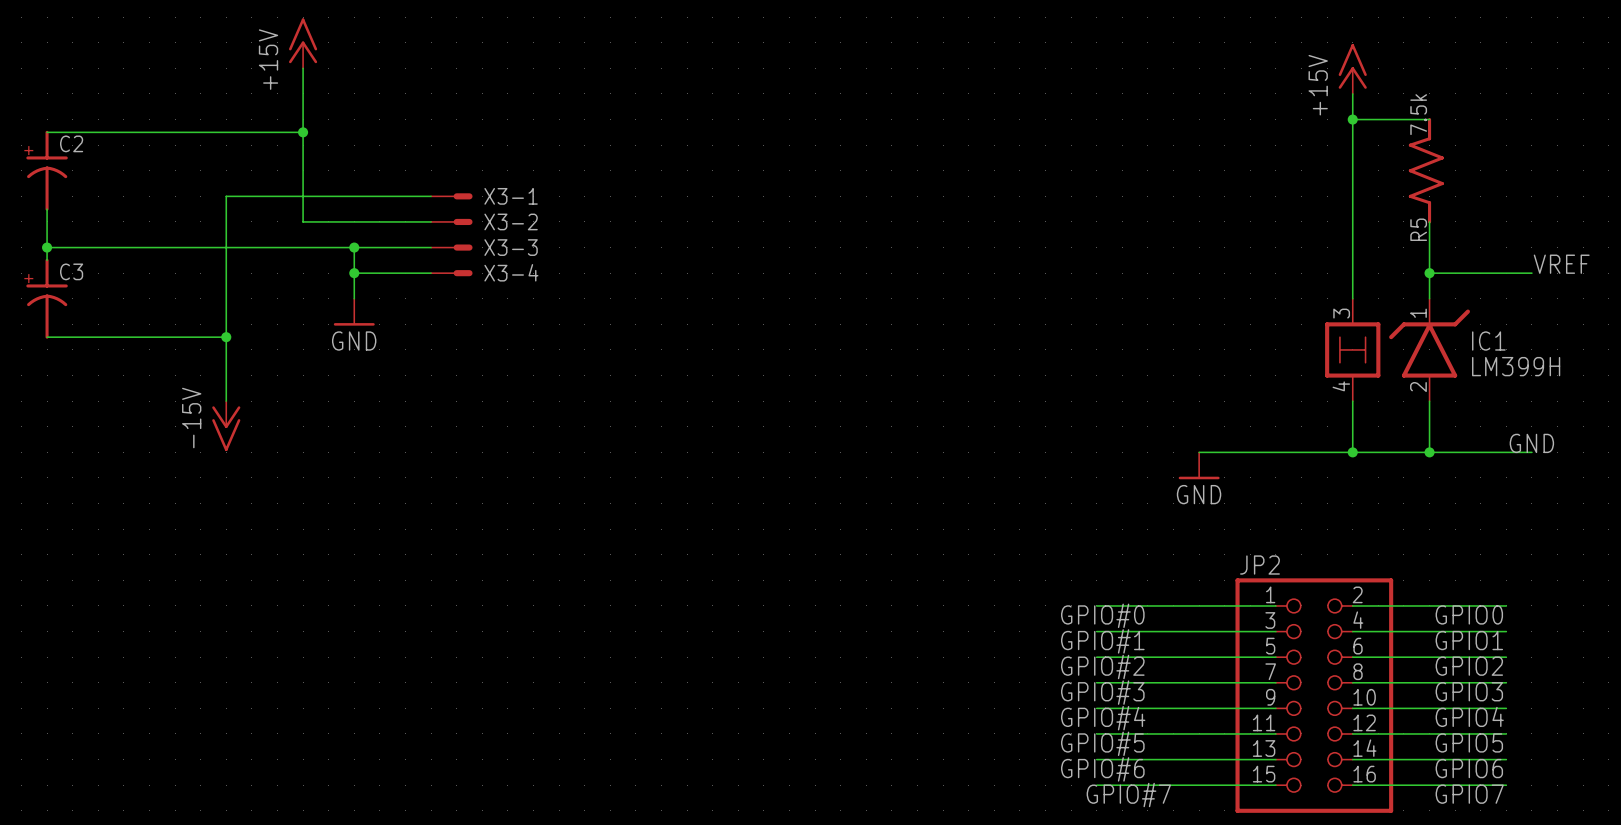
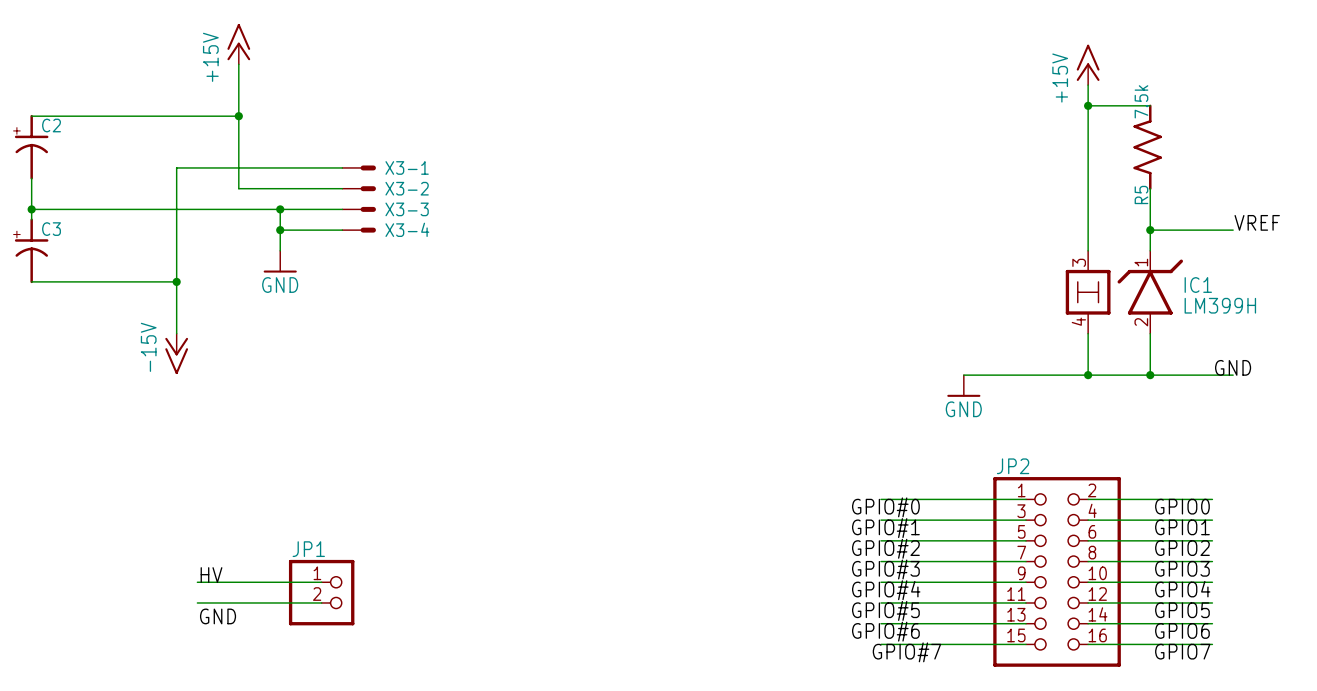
label: none -> HV (211, 575)
wire: none -> (197, 582) (321, 582)
JP1: none -> (321, 592)
wire: none -> (197, 602) (321, 602)
label: none -> GND (218, 616)

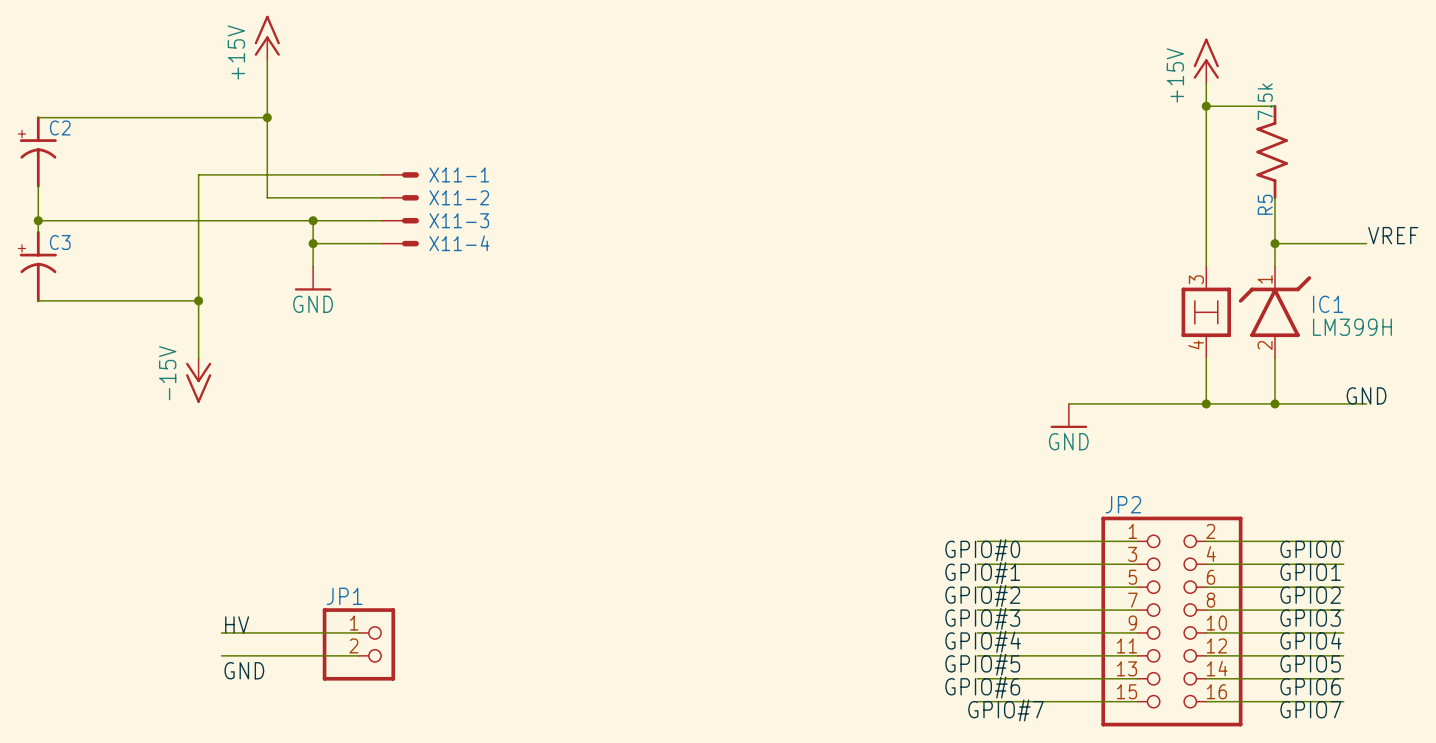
X3-1 name: X3-1 (407, 167) -> X11-1 (459, 174)
X3-2 name: X3-2 (407, 188) -> X11-2 (459, 197)
X3-3 name: X3-3 (407, 209) -> X11-3 (459, 220)
X3-4 name: X3-4 (407, 229) -> X11-4 (459, 243)

